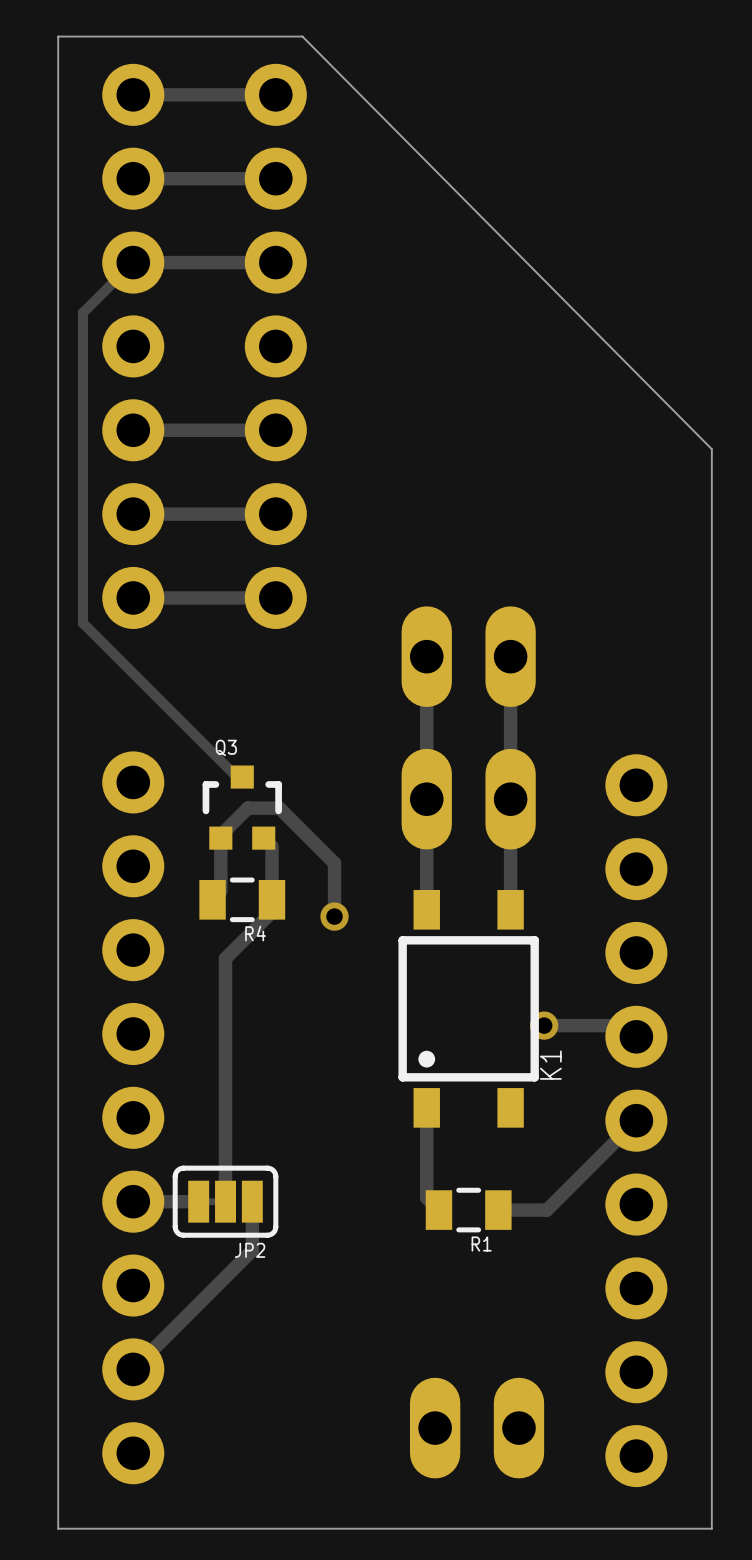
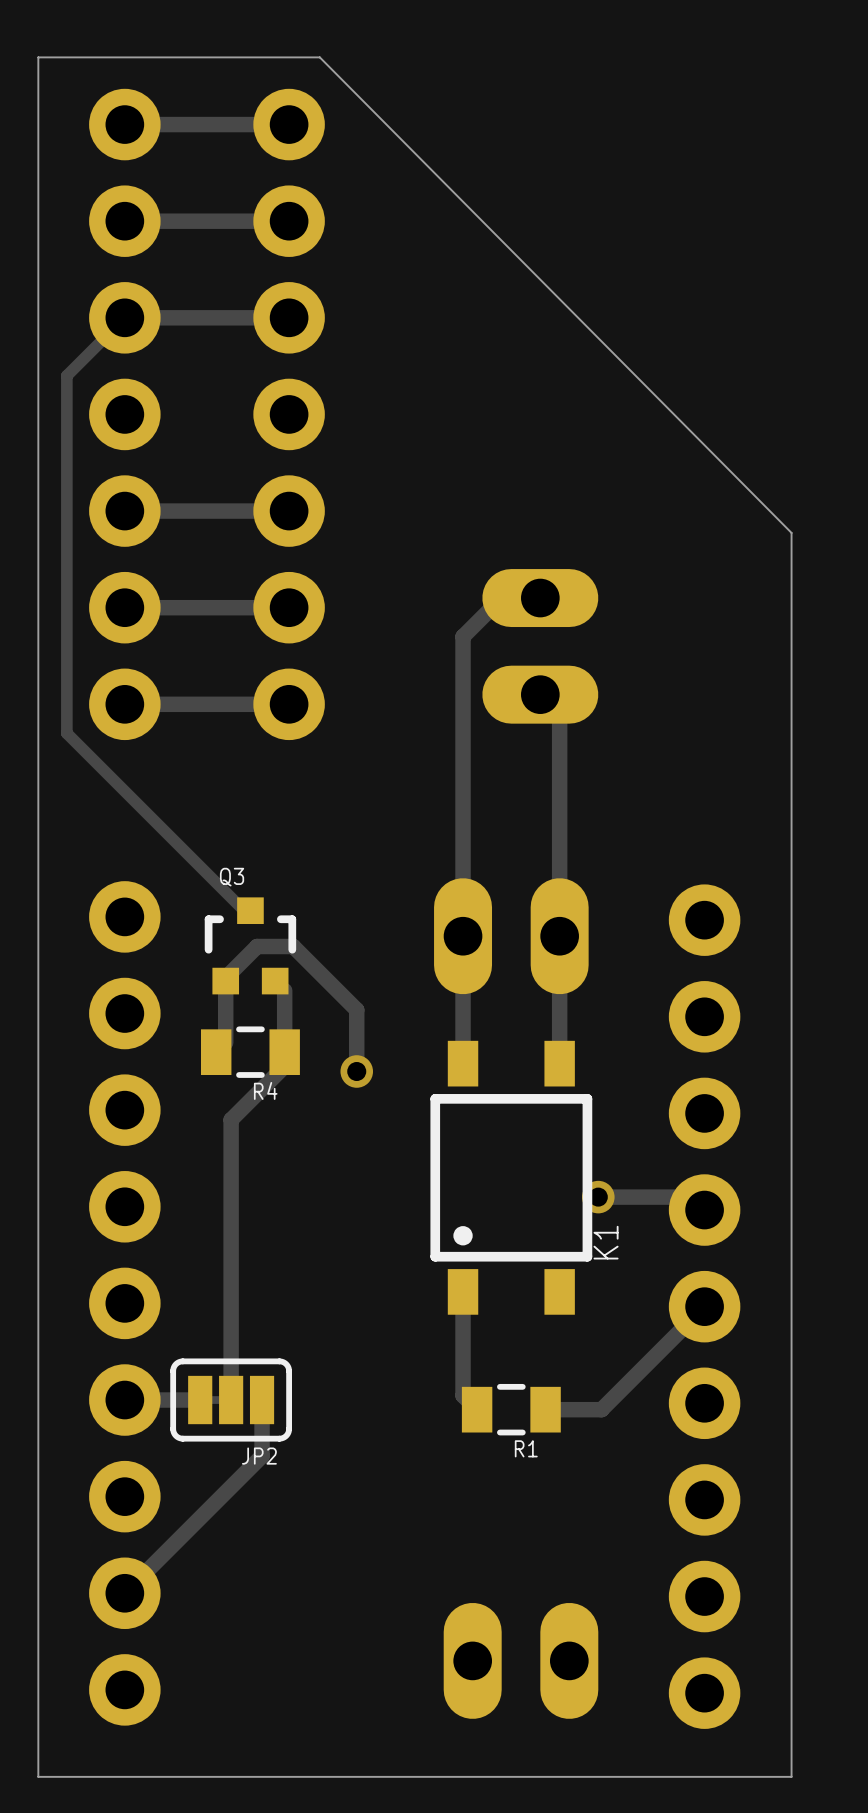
track: none -> (540, 598) (501, 598) (463, 636) (463, 771)
track: none -> (540, 694) (559, 713) (559, 771)
part rotation: 0° (468, 656) -> 90° clockwise (540, 646)
part position: (468, 656) -> (540, 646)

